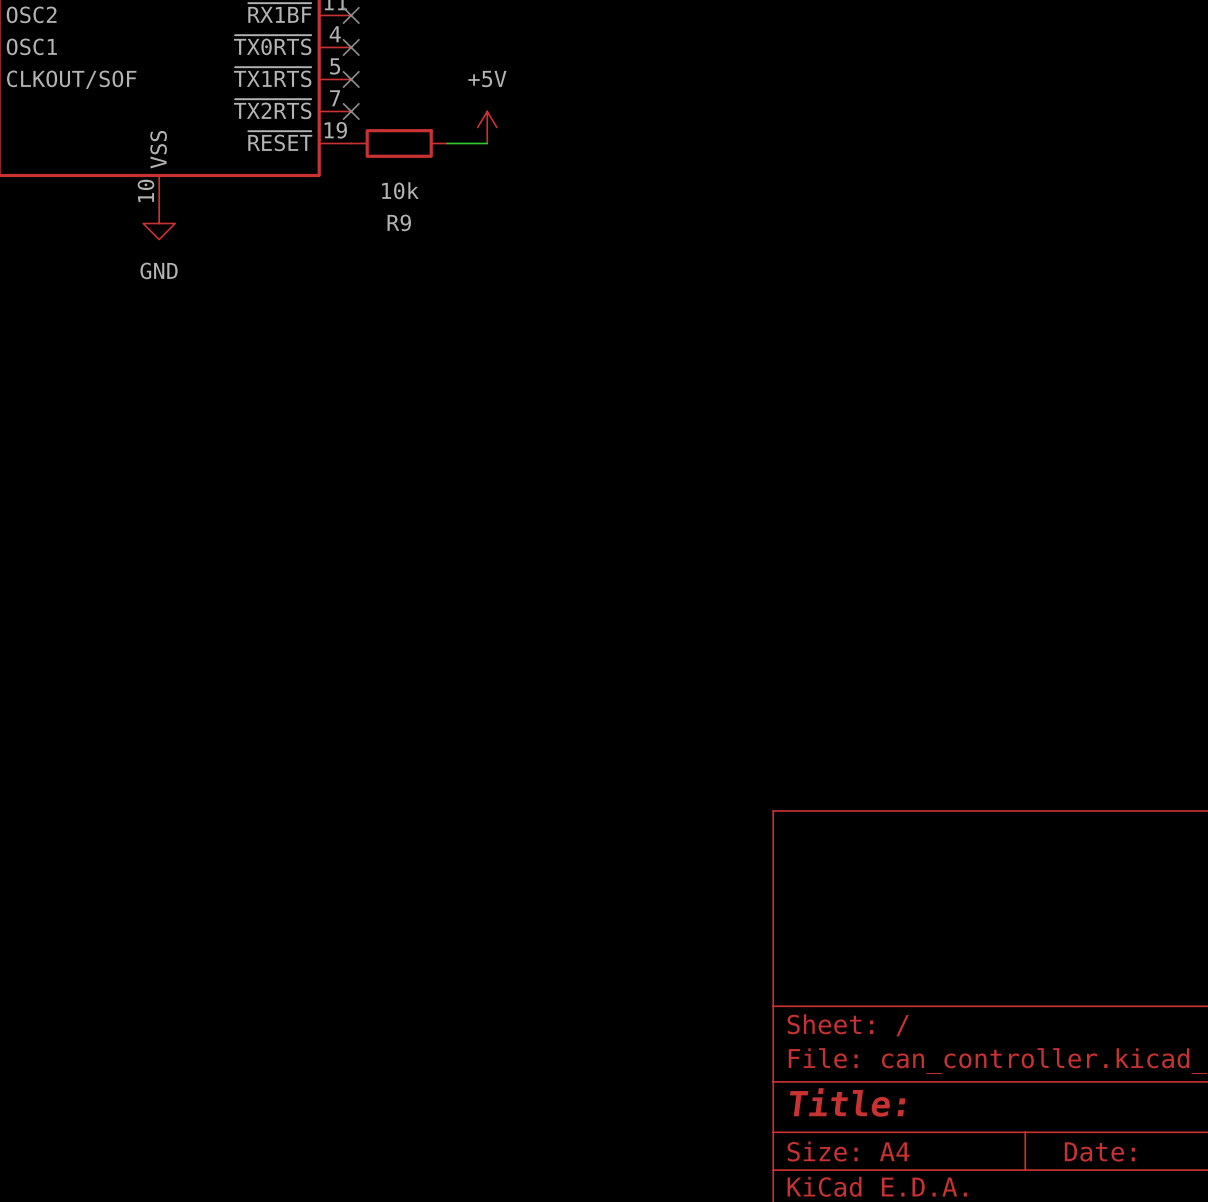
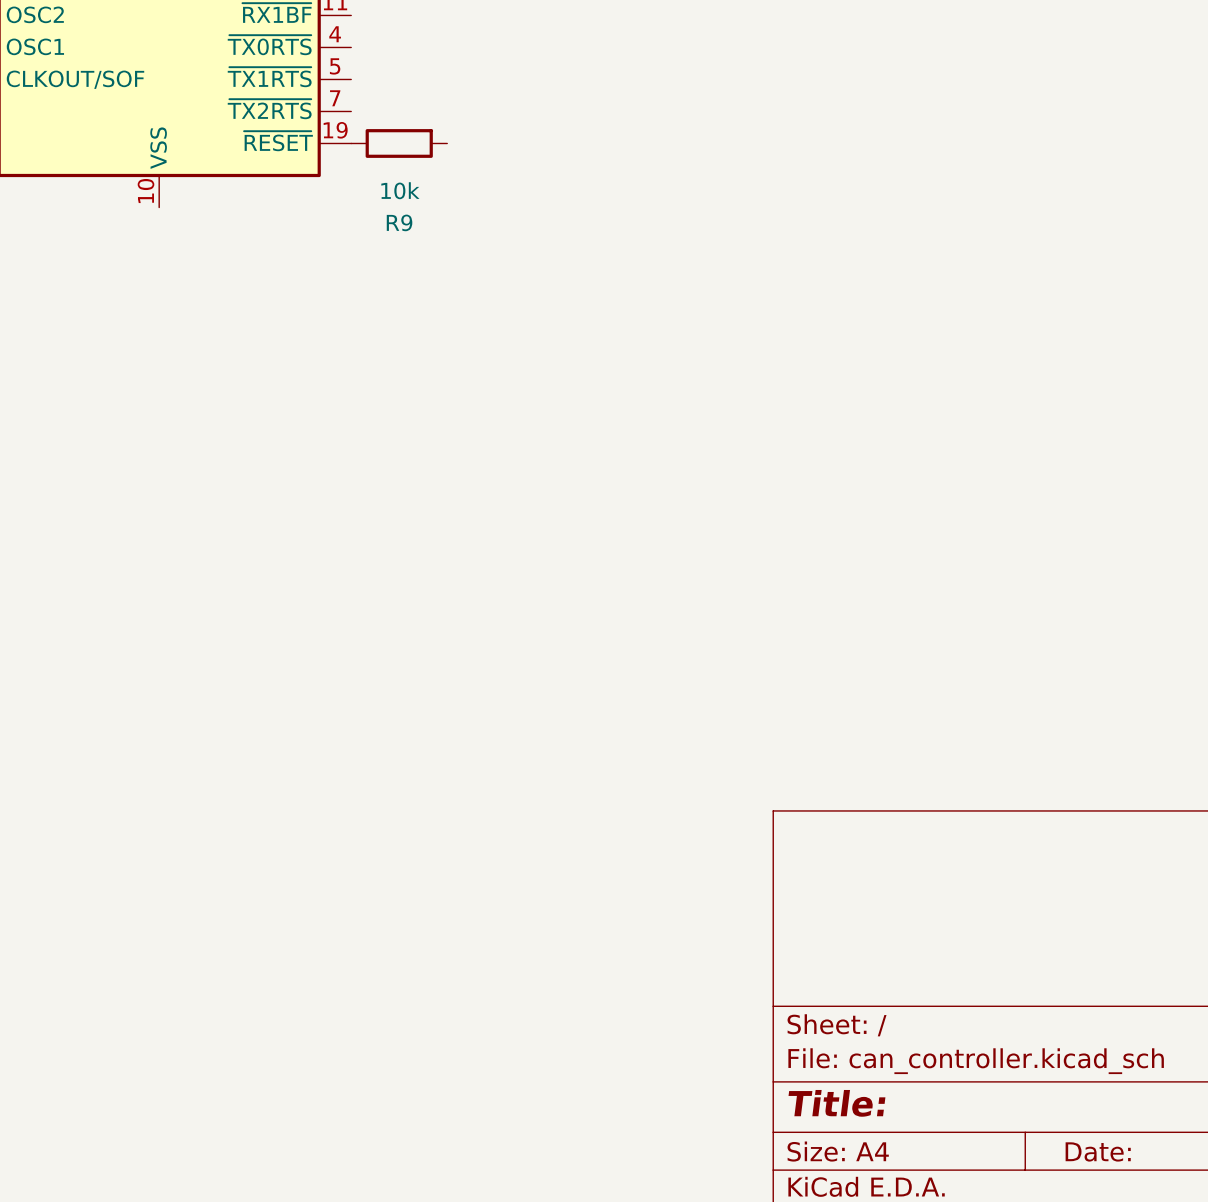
no-connect mark: (351, 15) -> none
no-connect mark: (351, 47) -> none
no-connect mark: (351, 79) -> none
no-connect mark: (351, 111) -> none
power symbol: +5V (487, 127) -> none
wire: (447, 143) (487, 143) -> none
power symbol: GND (159, 223) -> none

